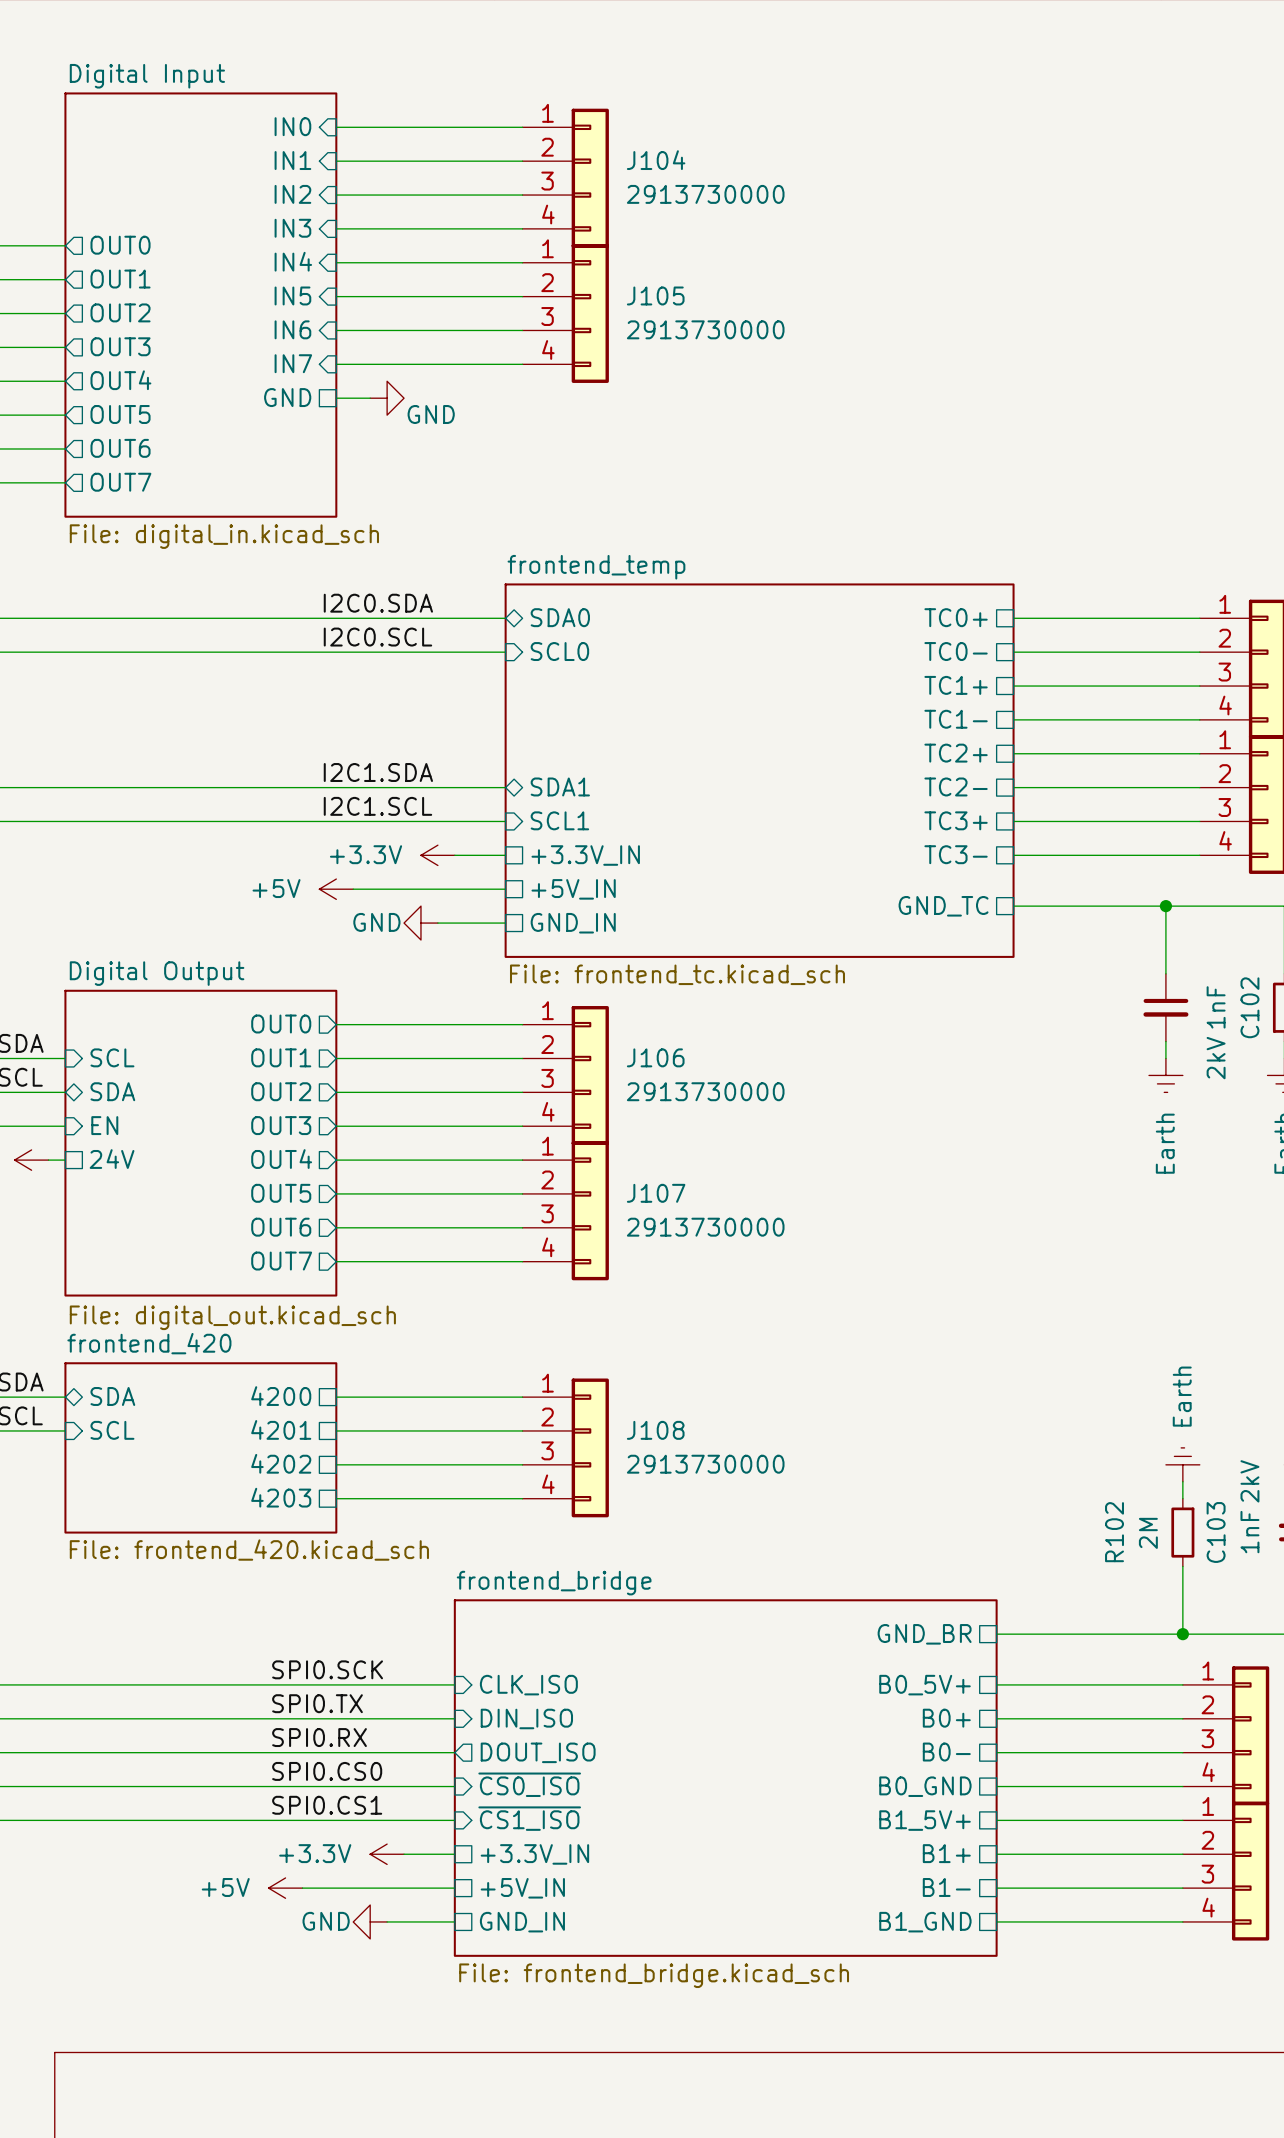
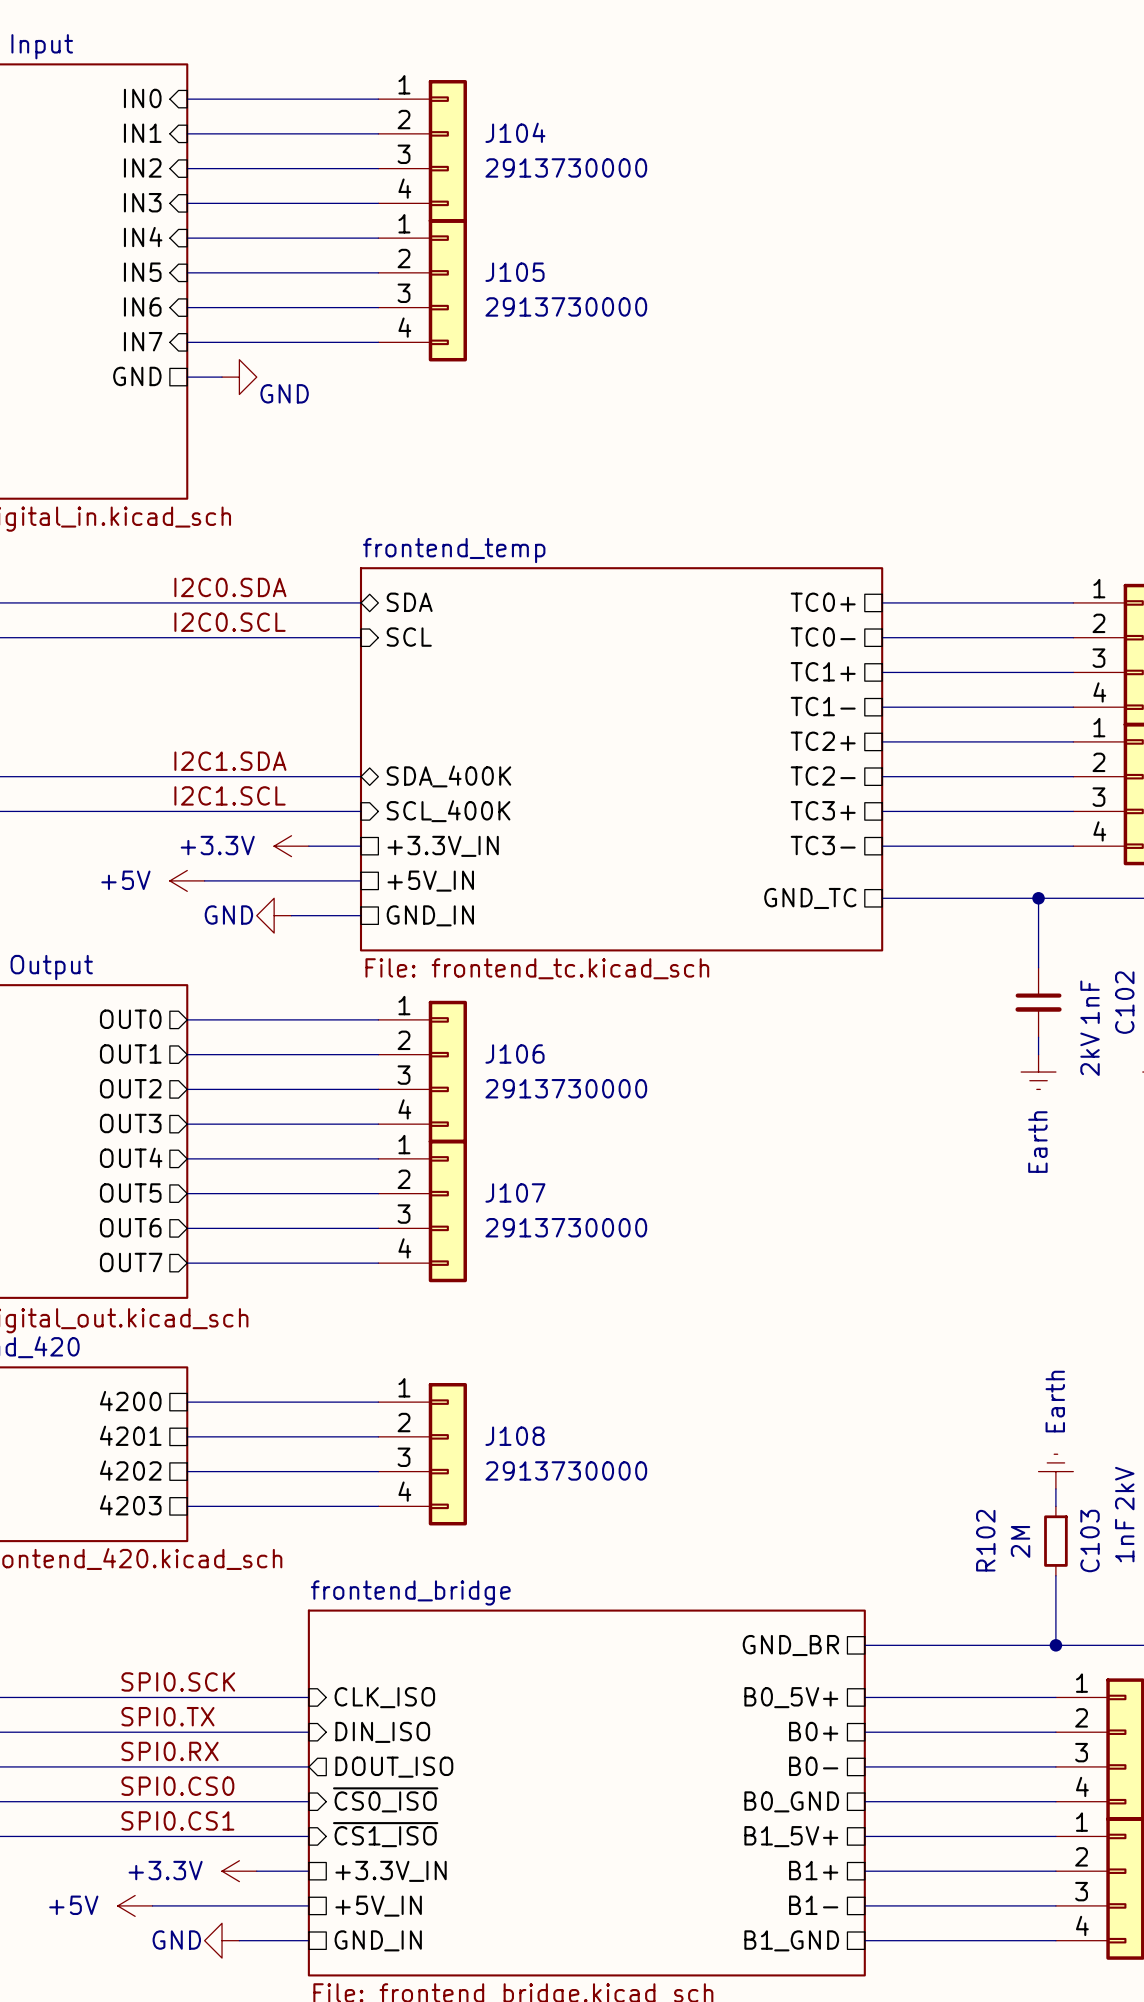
sheet pin: SDA0 (560, 617) -> SDA (409, 602)
sheet pin: SCL0 (559, 651) -> SCL (409, 637)
sheet pin: SDA1 (560, 786) -> SDA_400K (448, 776)
sheet pin: SCL1 (559, 820) -> SCL_400K (448, 811)

